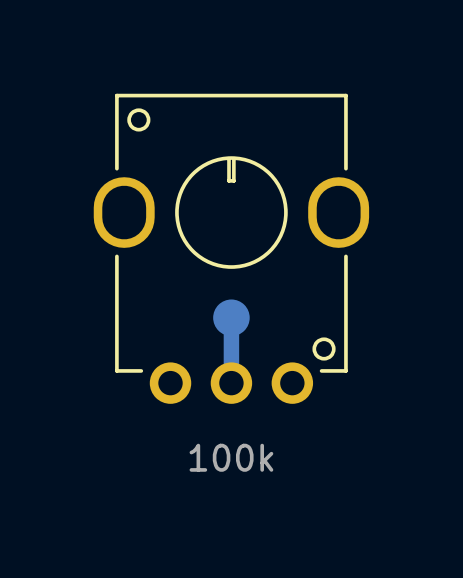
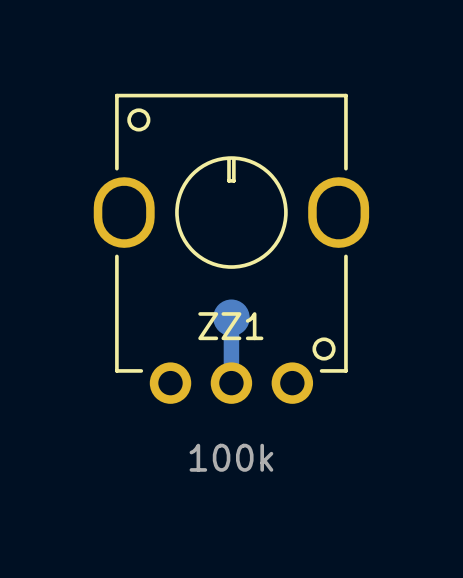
ZZ1 name: none -> ZZ1 (230, 326)

